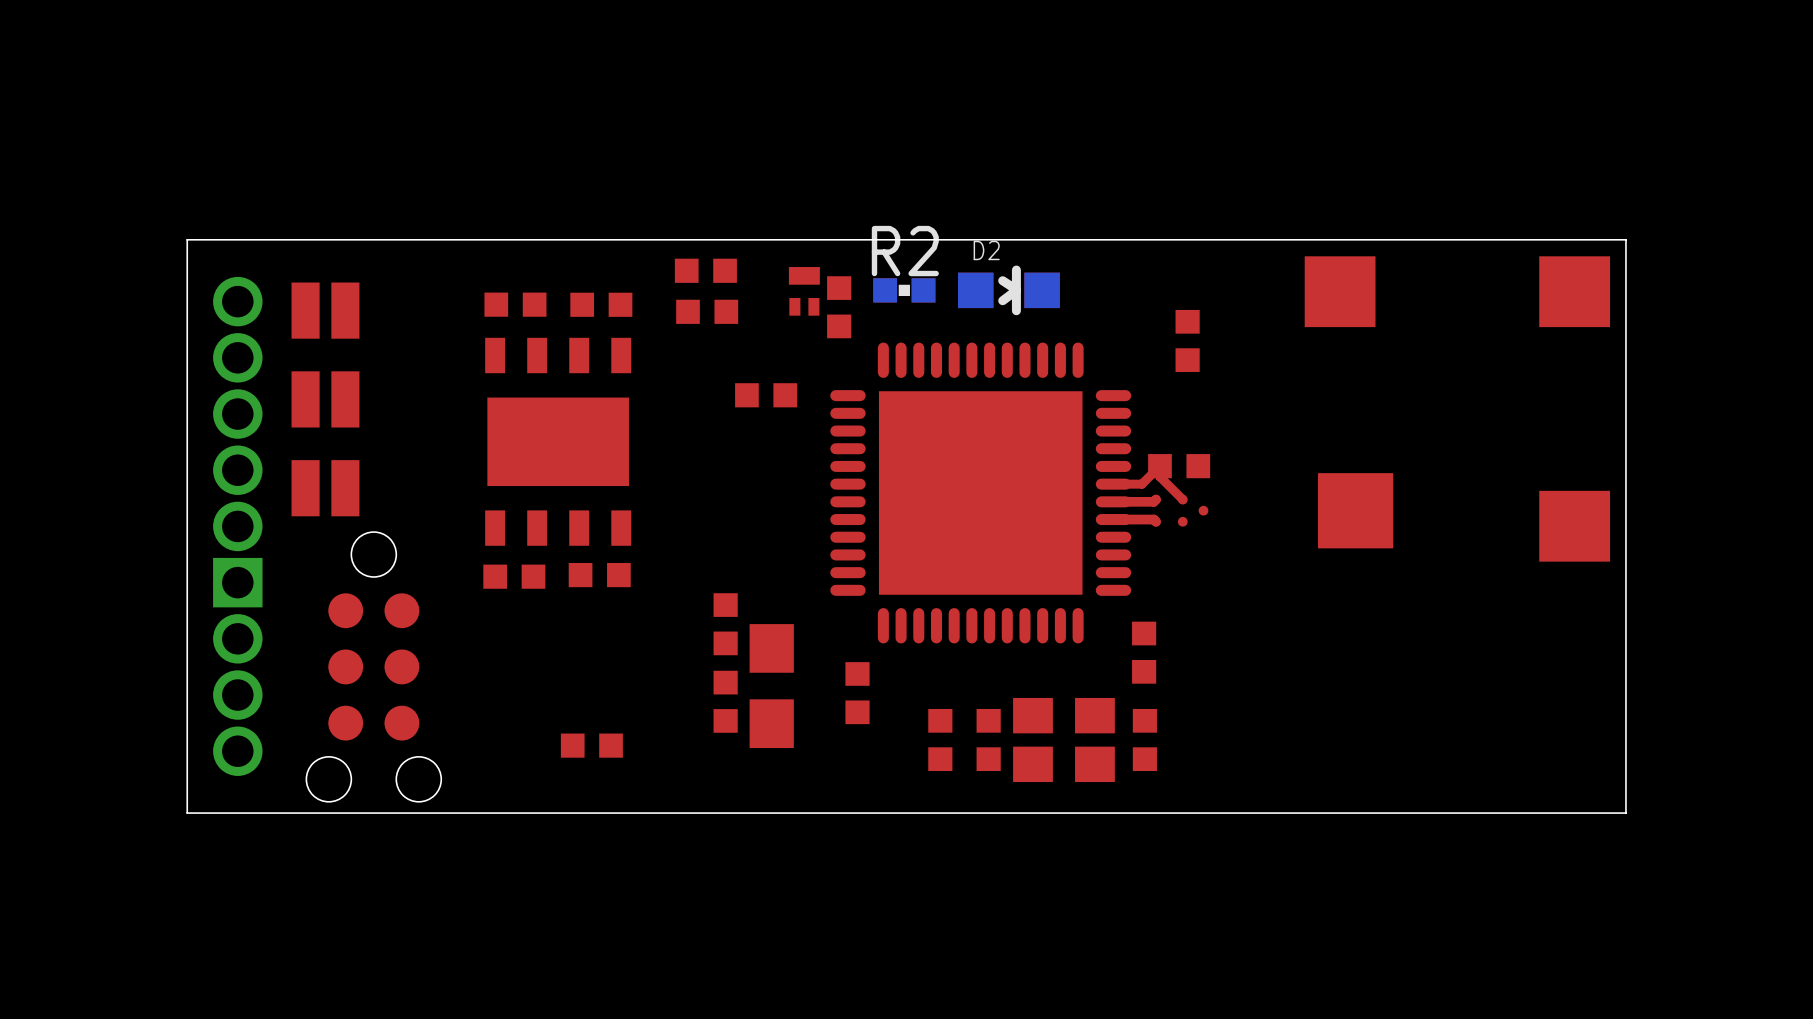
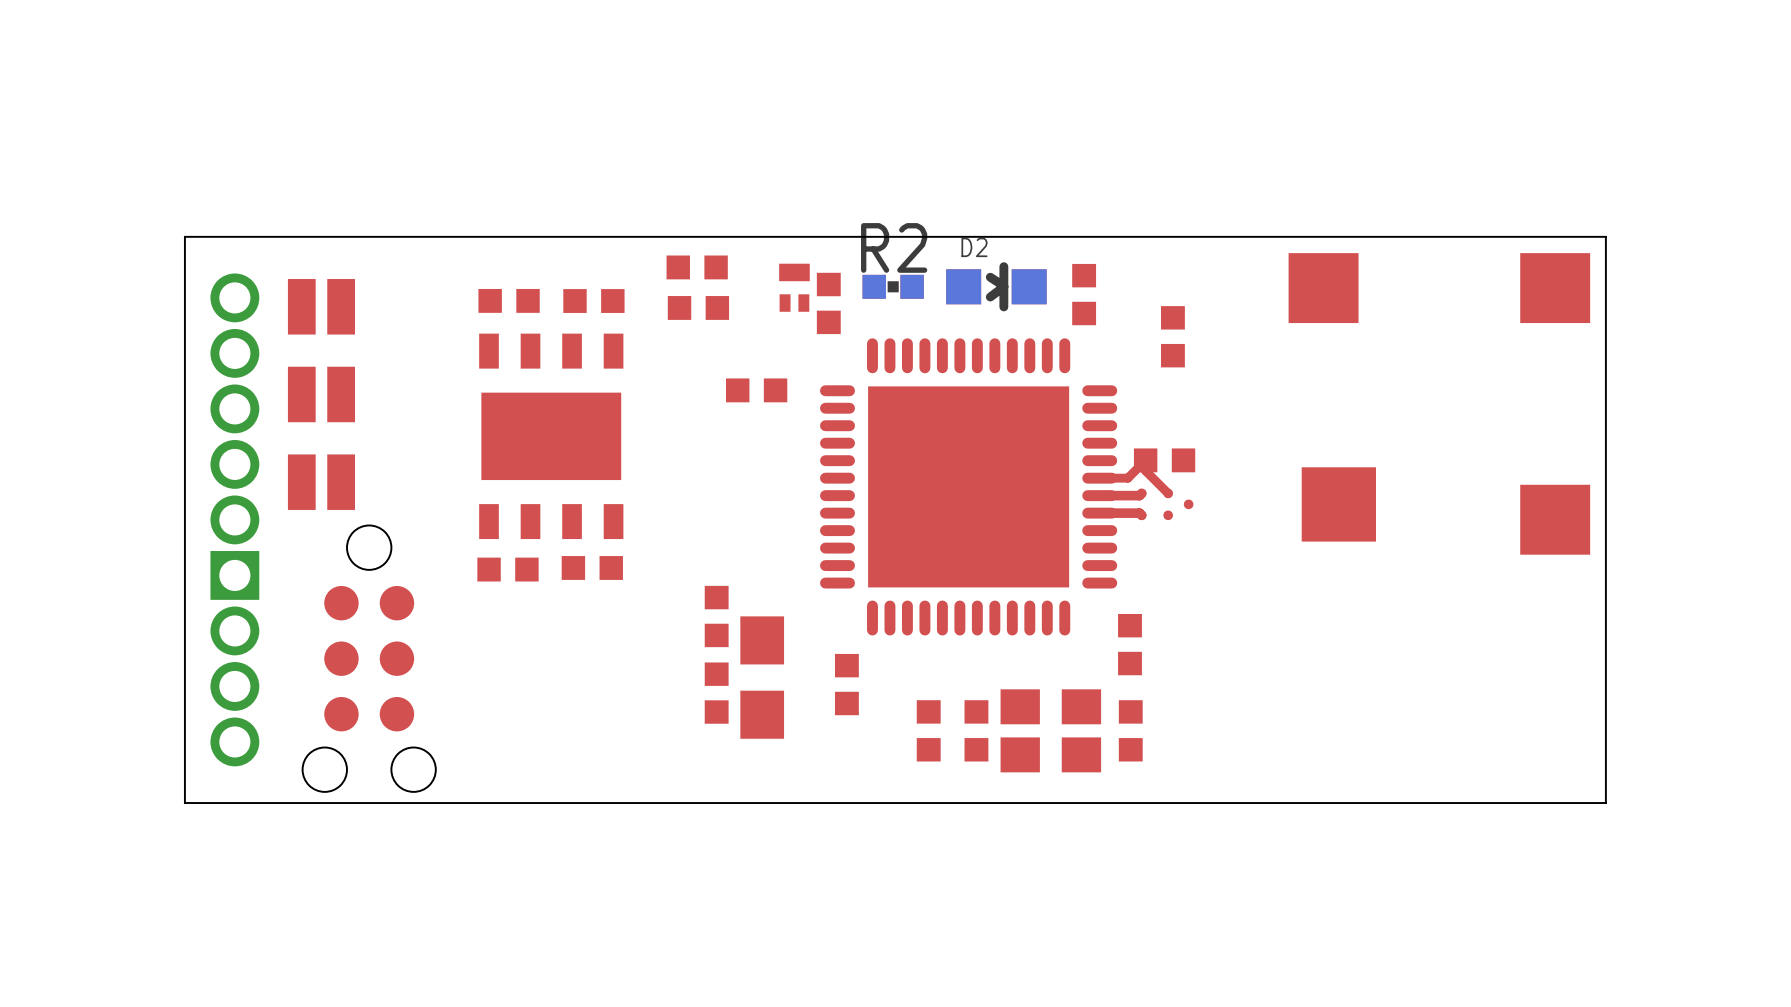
part rotation: 0° (591, 745) -> 90° clockwise (1084, 294)
part position: (591, 745) -> (1084, 294)

